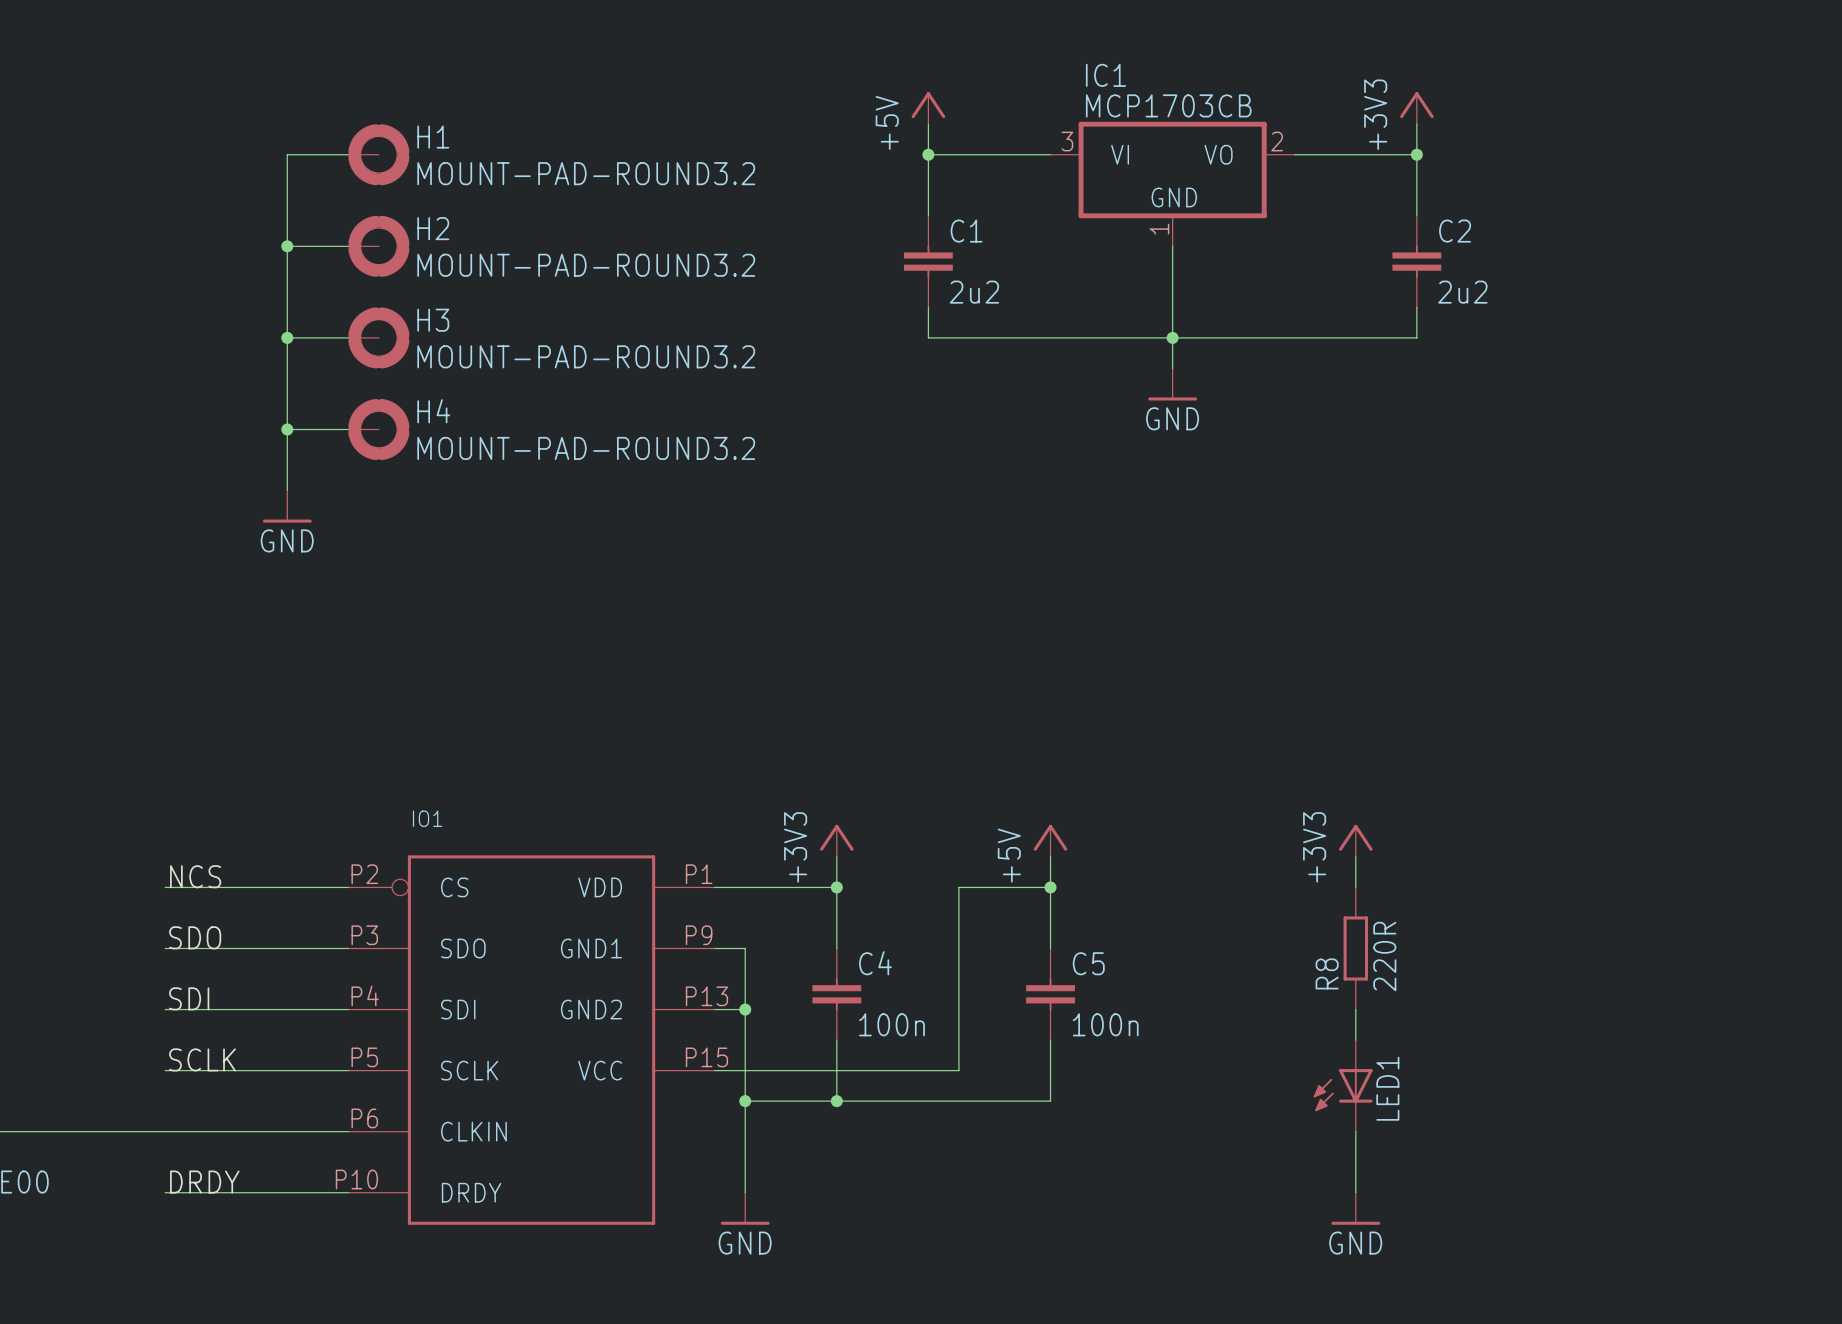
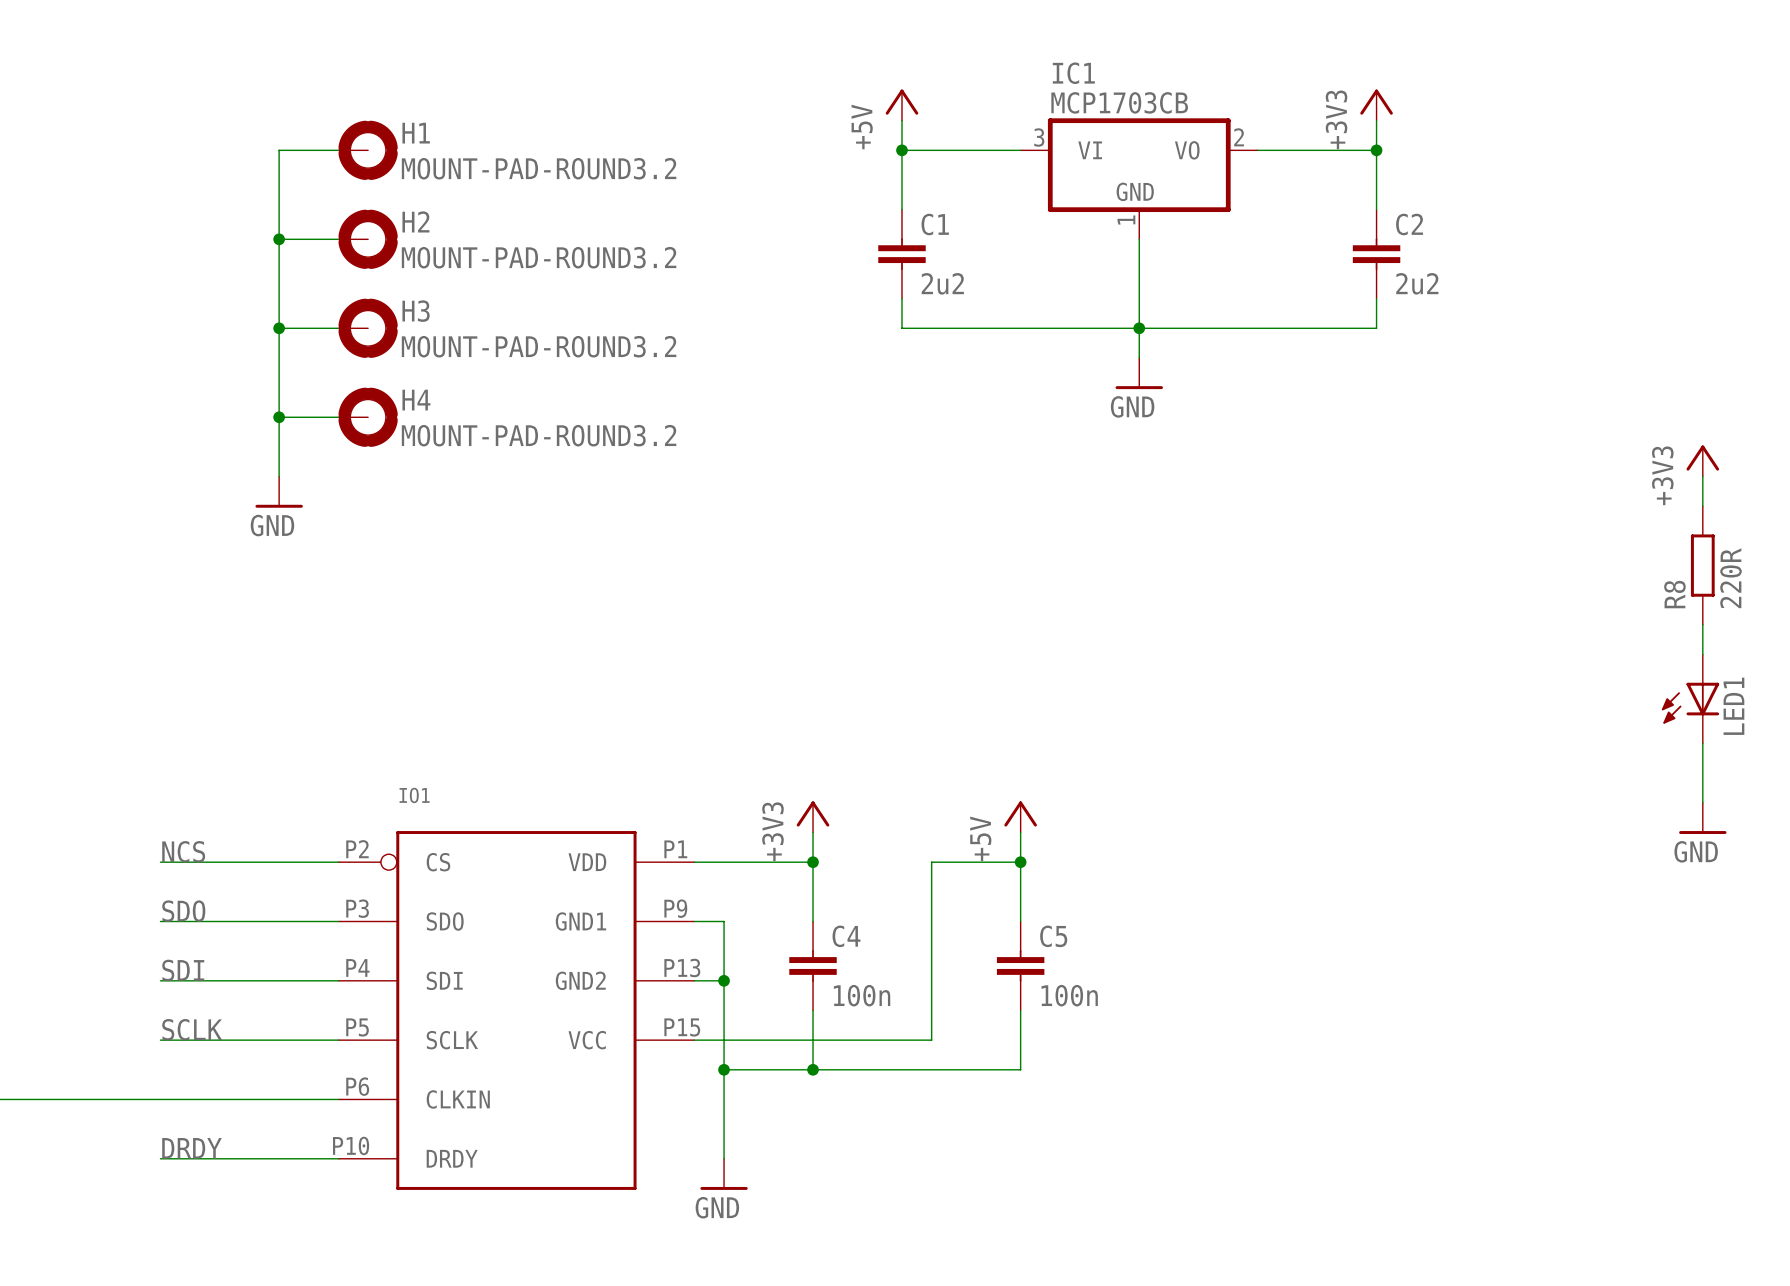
power symbol: none -> +3V3 (1702, 461)
wire: none -> (1702, 476) (1702, 506)
wire: none -> (1702, 624) (1702, 654)
wire: none -> (1702, 743) (1702, 802)
power symbol: +3V3 (1355, 840) -> none
power symbol: none -> GND (1702, 818)
wire: (1355, 856) (1355, 887) -> none
R8 position: (1355, 948) -> (1702, 565)
wire: (1355, 1009) (1355, 1040) -> none
LED1 position: (1343, 1085) -> (1690, 699)
wire: (1355, 1131) (1355, 1192) -> none
power symbol: GND (1355, 1208) -> none

